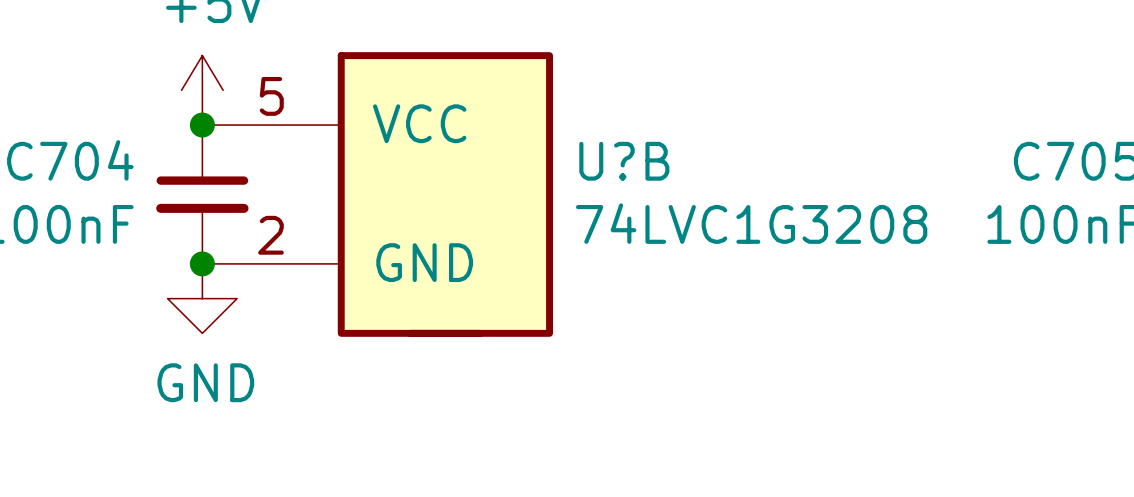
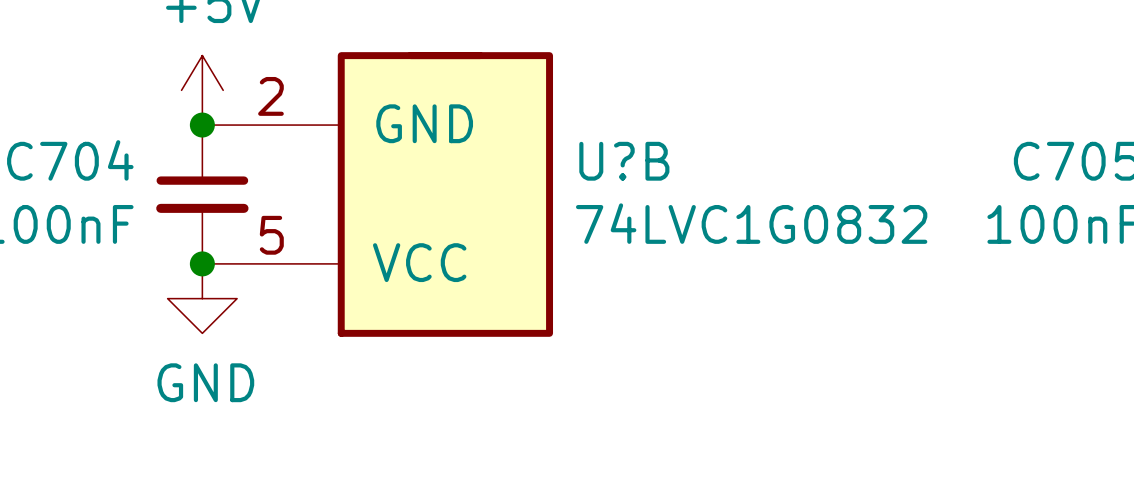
U?B flip: as is (445, 194) -> up-down (445, 194)
U?B value: 74LVC1G3208 (751, 223) -> 74LVC1G0832 (751, 223)

